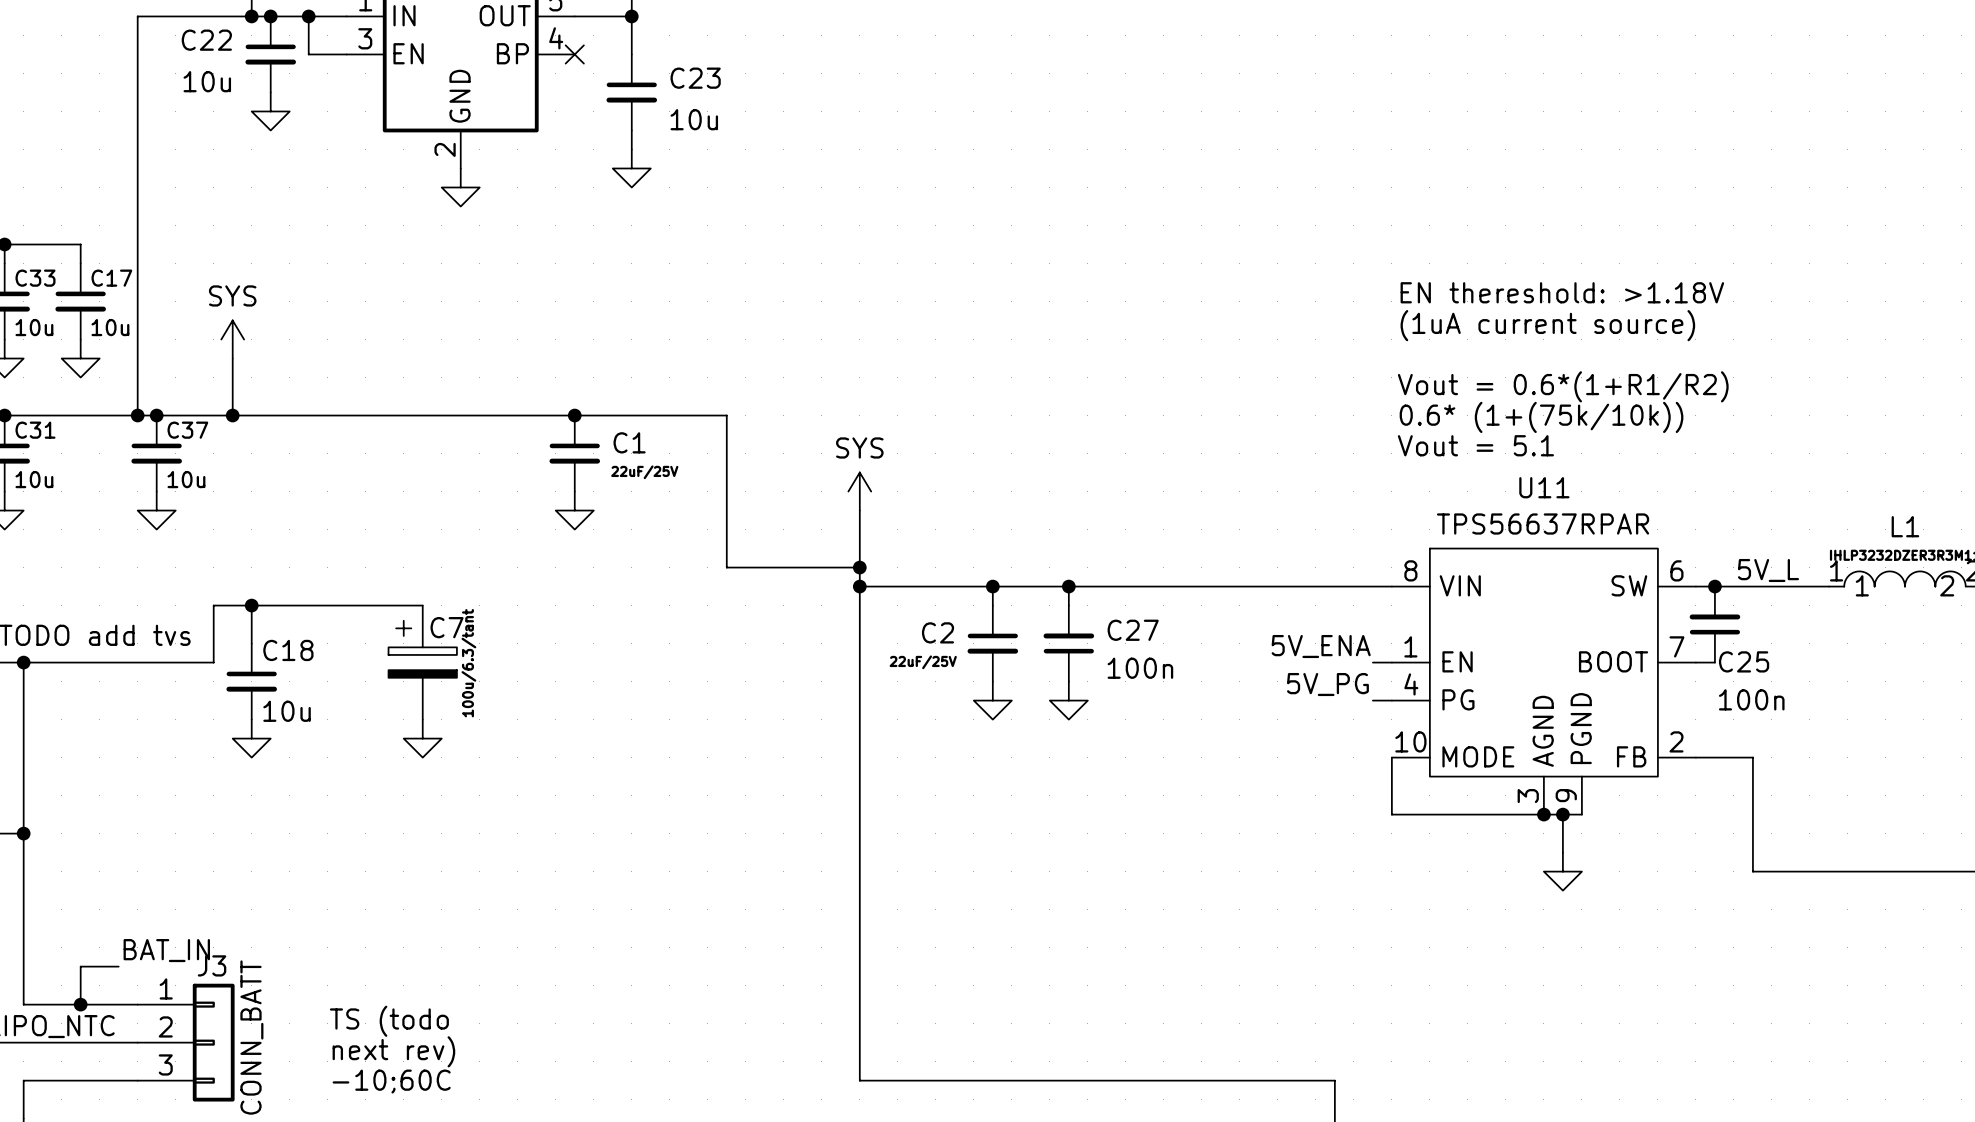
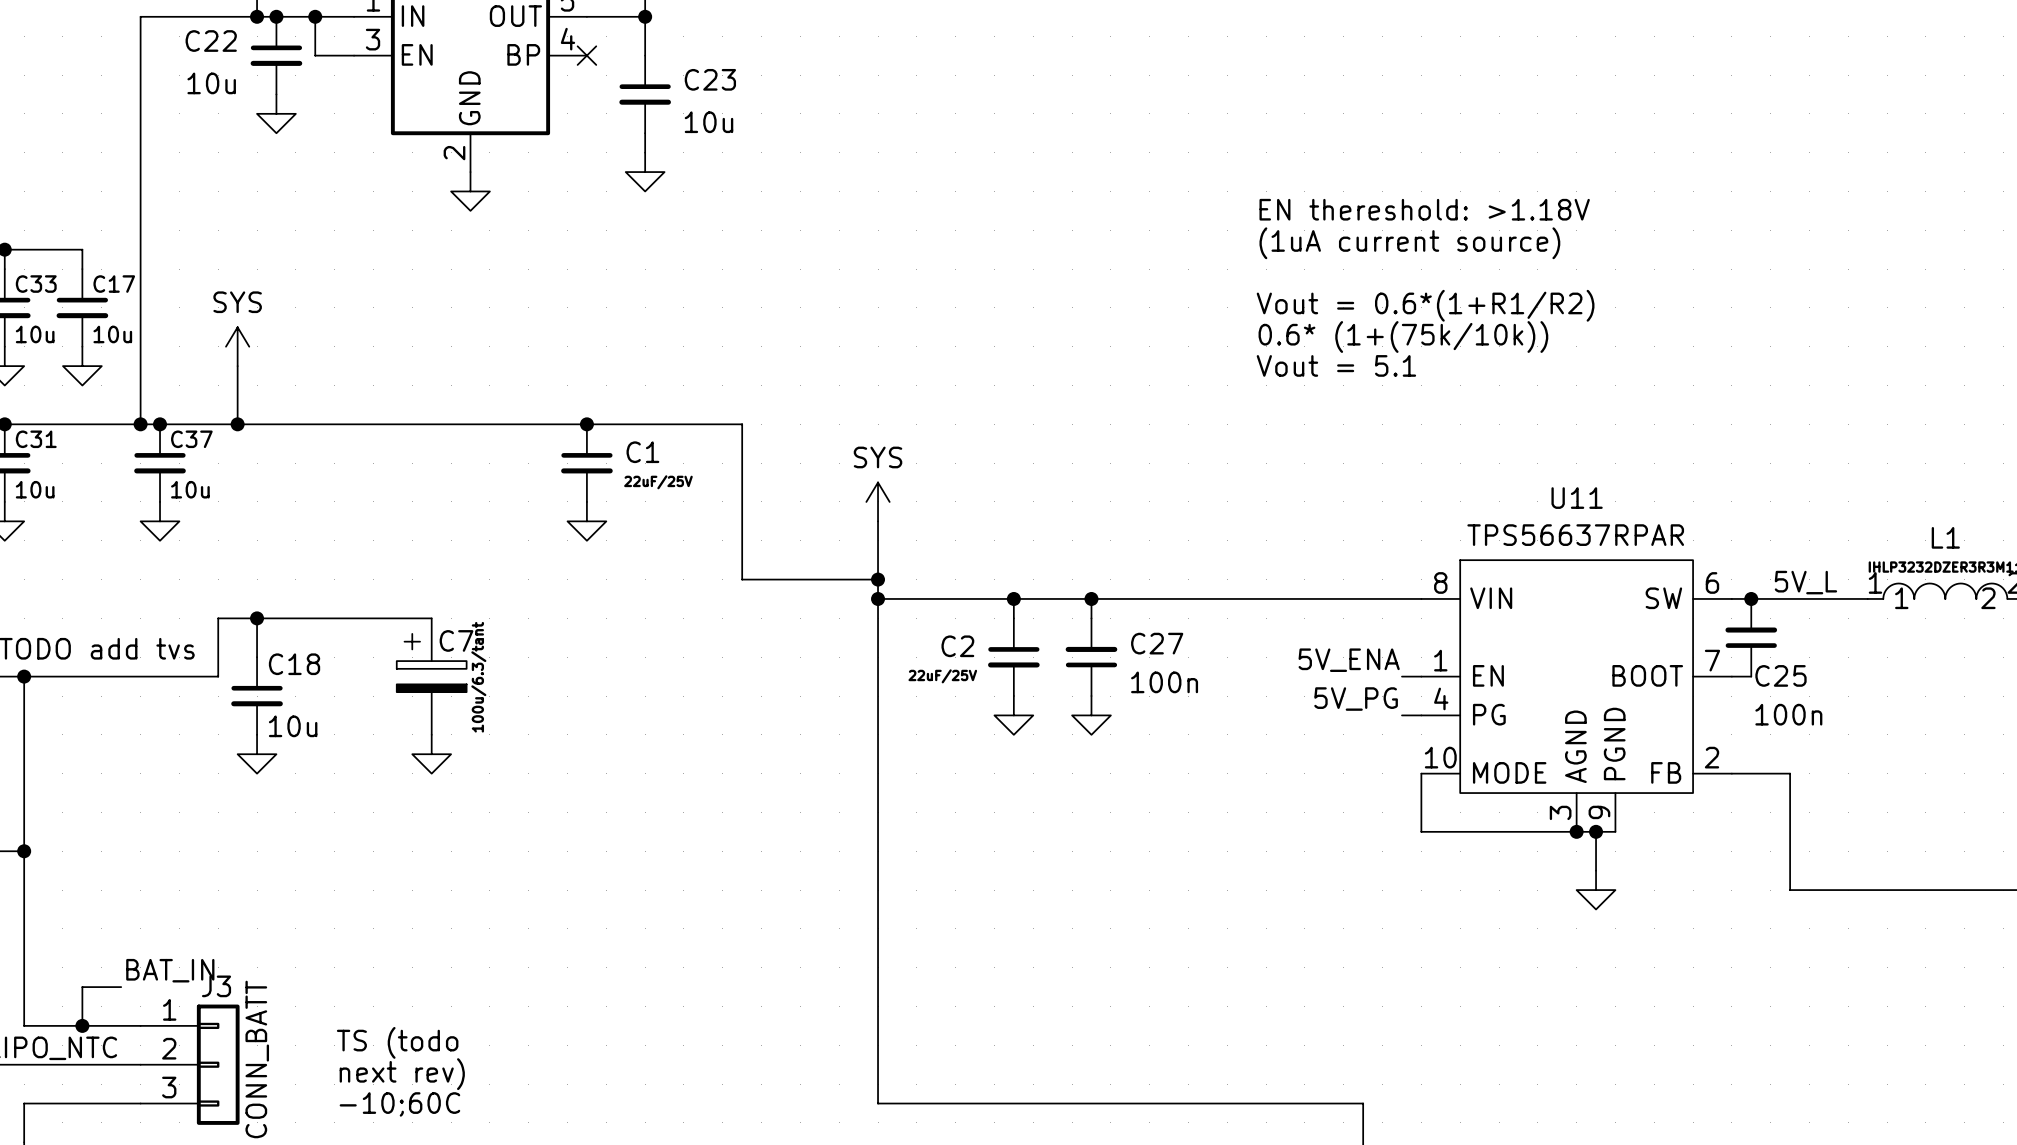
text position: EN thereshold: >1.18V (1562, 292) -> EN thereshold: >1.18V (1424, 209)
text position: (1uA current source) (1547, 325) -> (1uA current source) (1409, 243)
text position: Vout = 0.6*(1+R1/R2) (1563, 386) -> Vout = 0.6*(1+R1/R2) (1425, 305)
text position: 0.6* (1+(75k/10k)) (1541, 417) -> 0.6* (1+(75k/10k)) (1403, 337)
text position: Vout = 5.1 (1475, 445) -> Vout = 5.1 (1336, 365)

